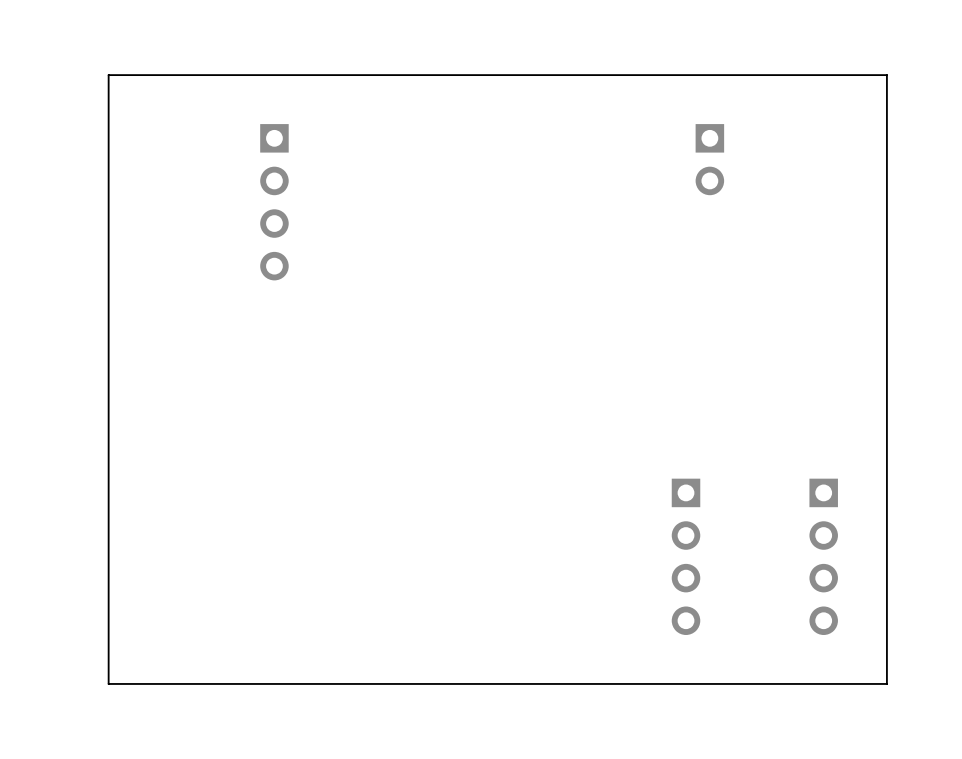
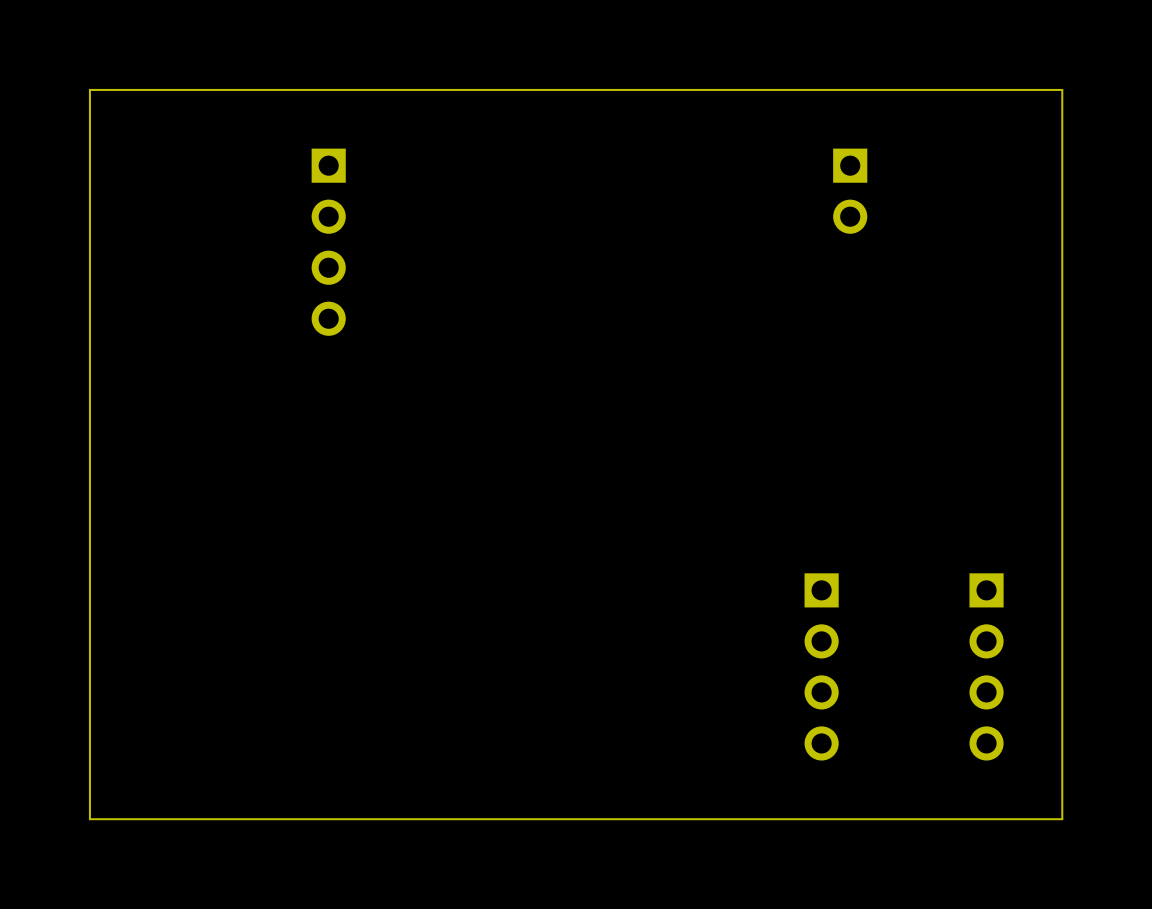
board edge: (108, 75) (108, 683) -> (130, 89) (89, 89) (89, 819) (130, 819)

